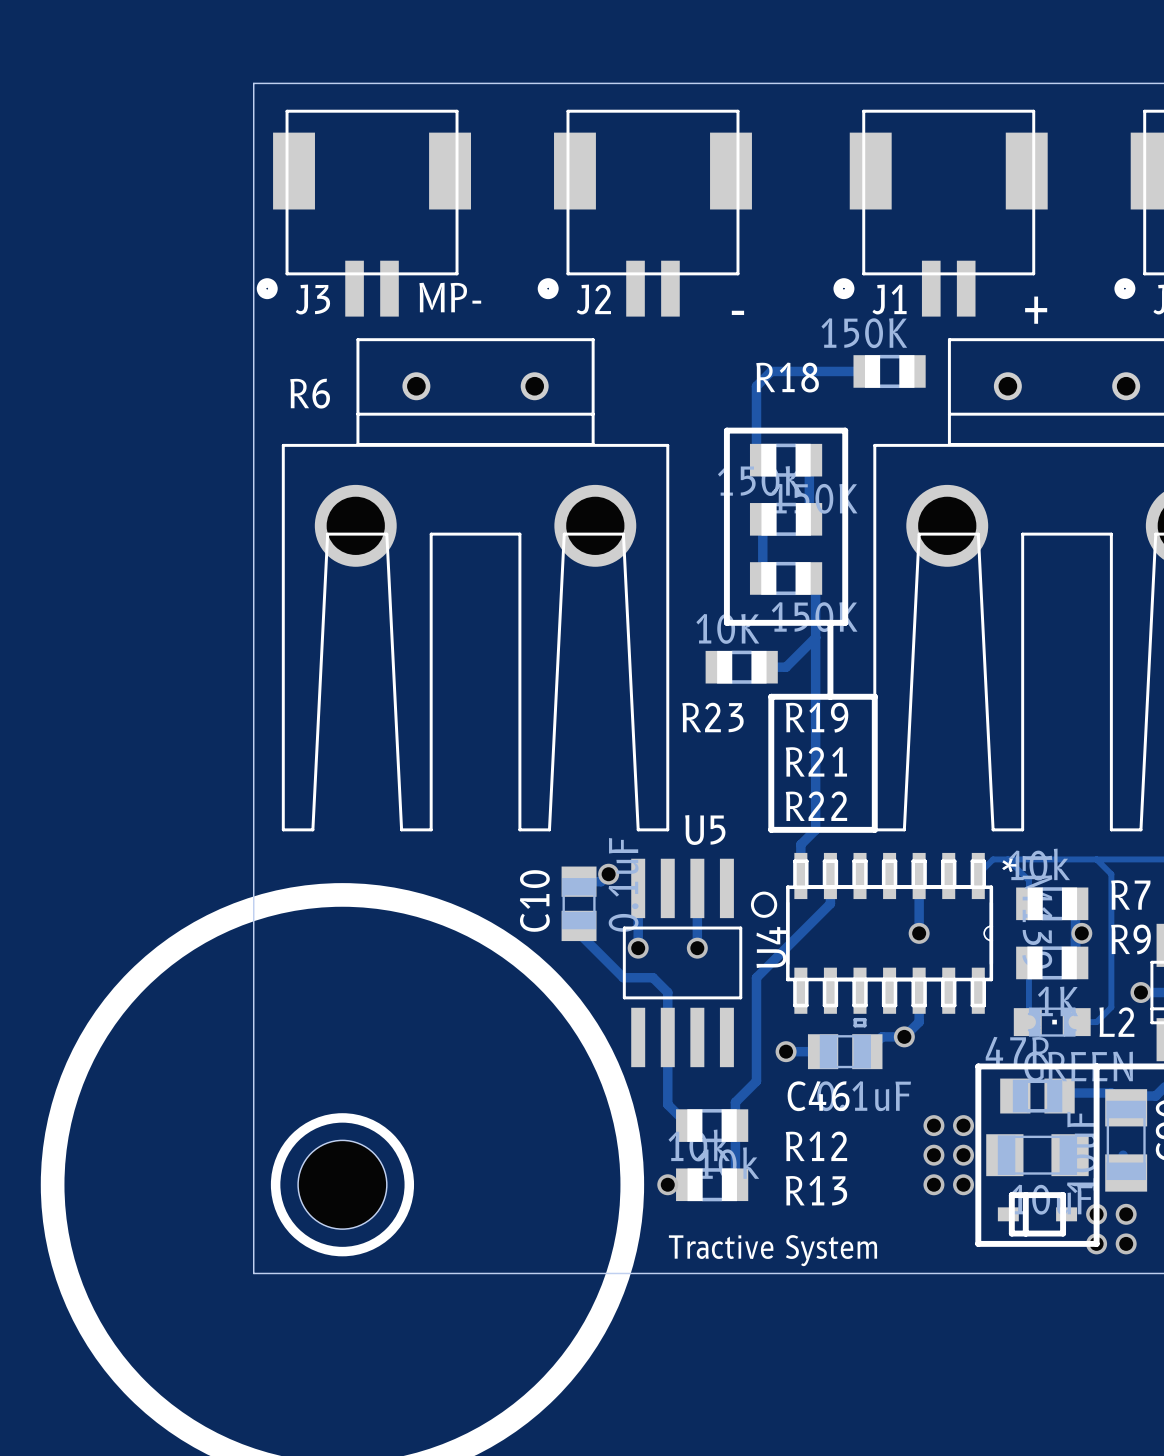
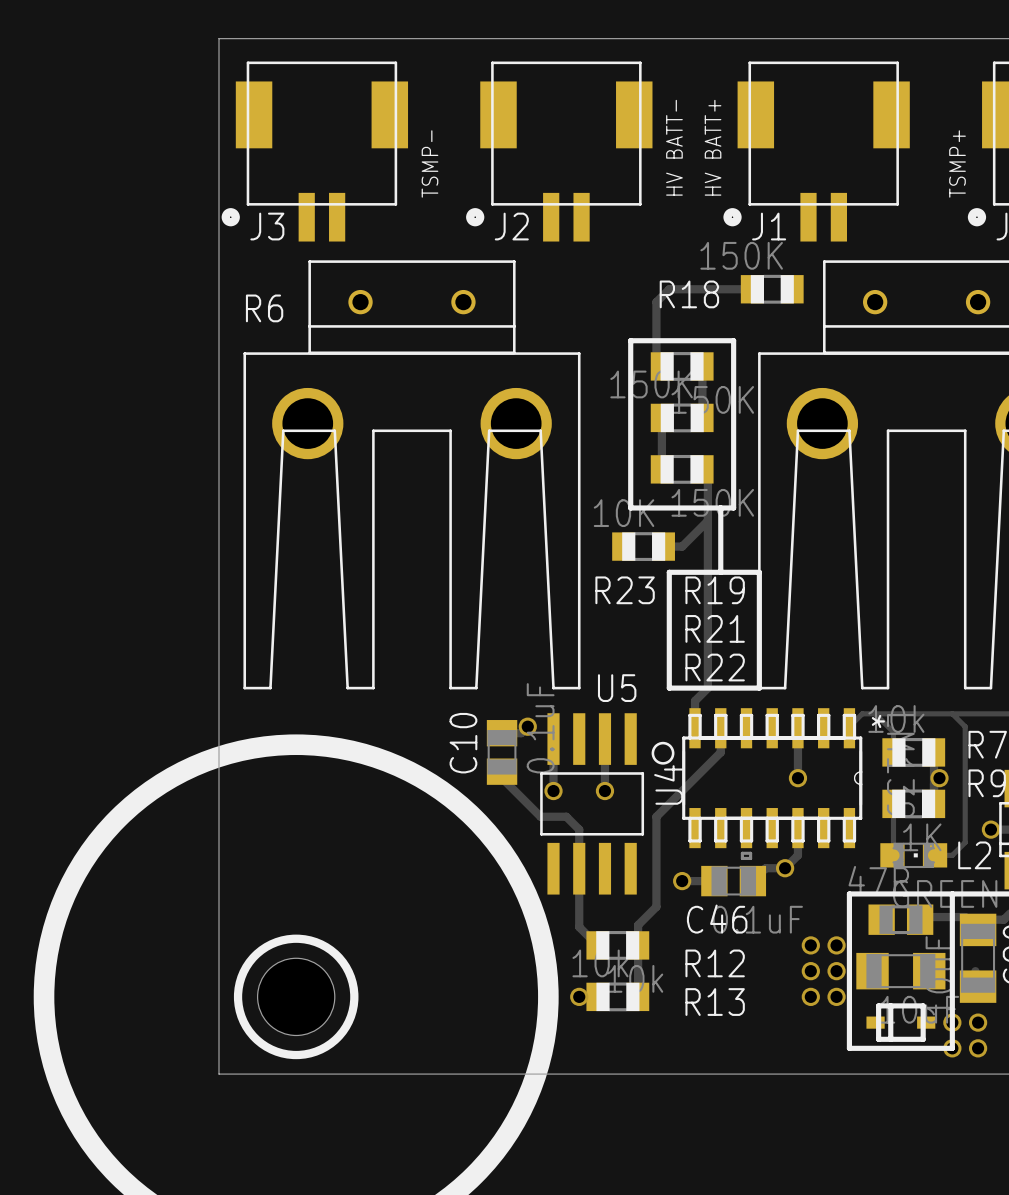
text: none -> HV BATT+ (713, 147)
text: none -> HV BATT- (674, 147)
text: none -> TSMP+ (957, 163)
text: none -> TSMP- (430, 163)
text: MP- (450, 297) -> none
text: + (1036, 310) -> none
text: - (737, 312) -> none
text: Tractive System (772, 1250) -> none

